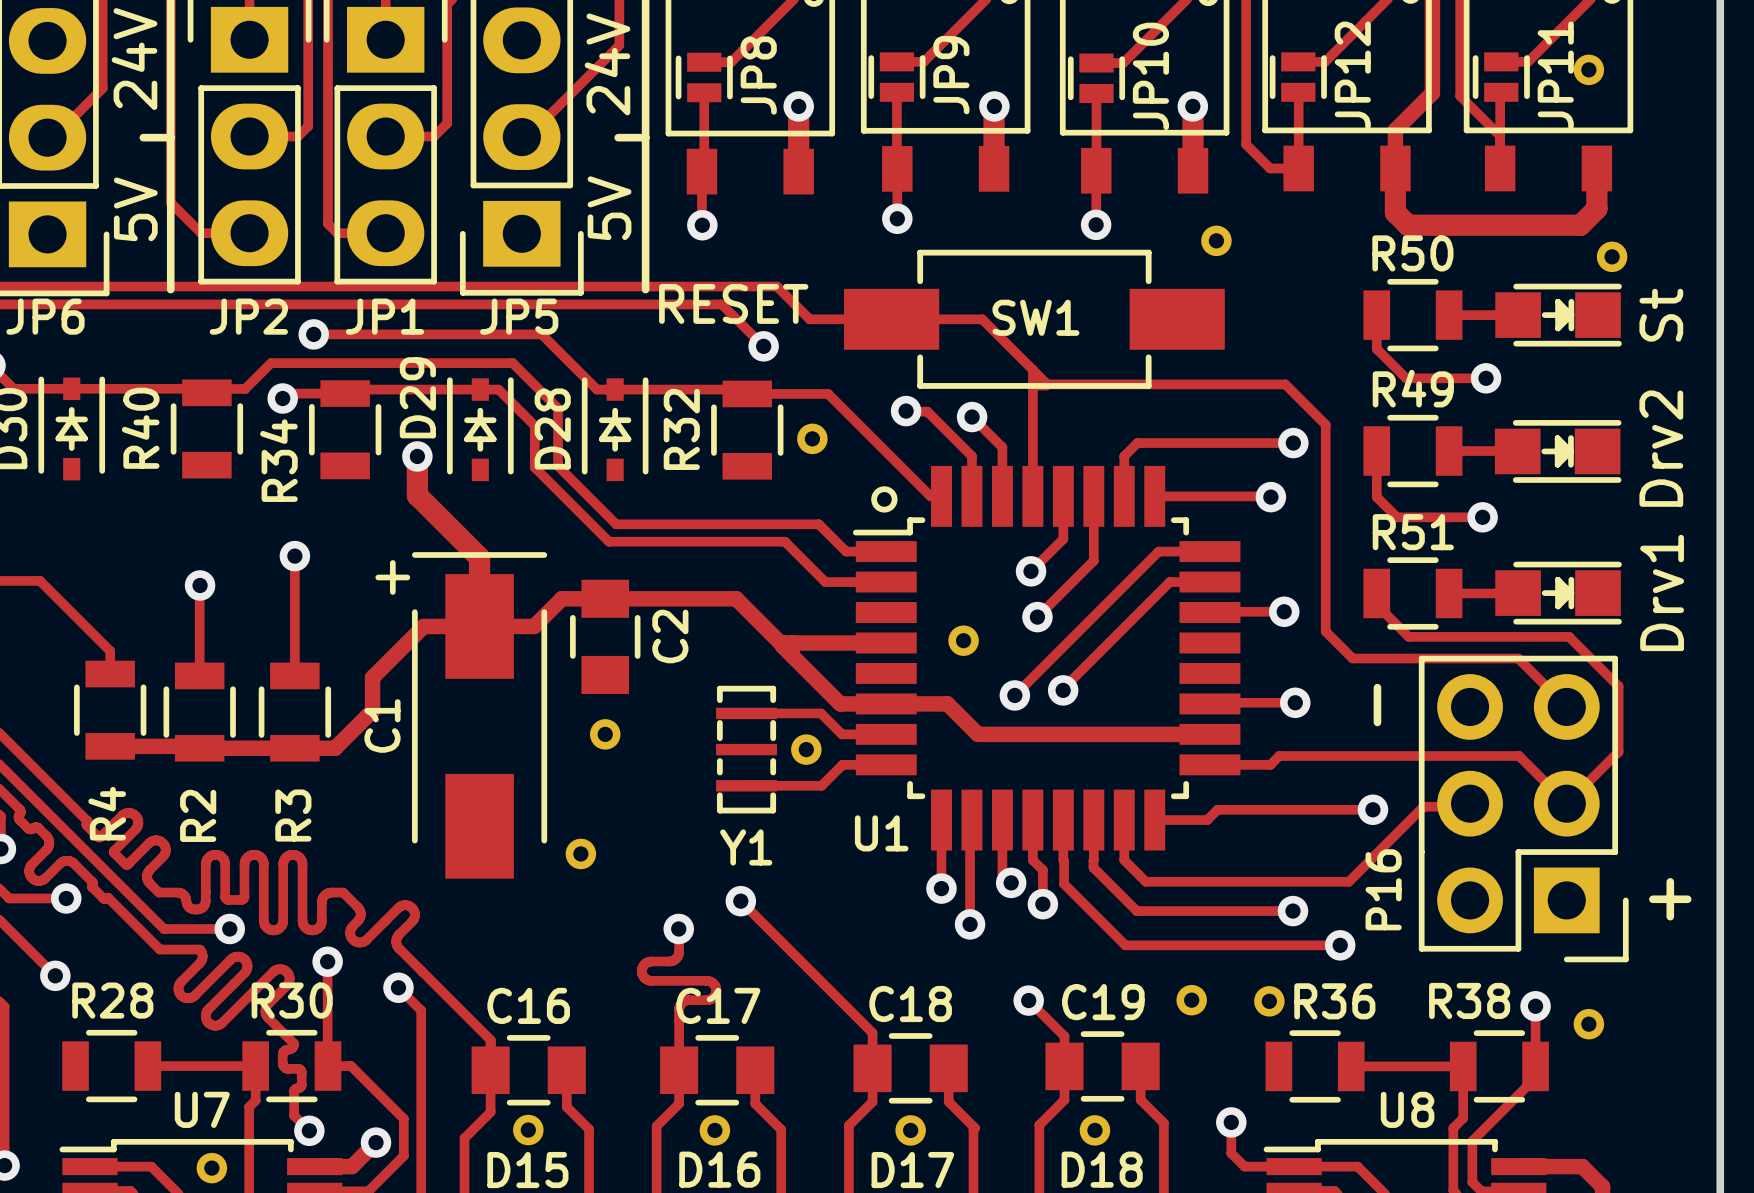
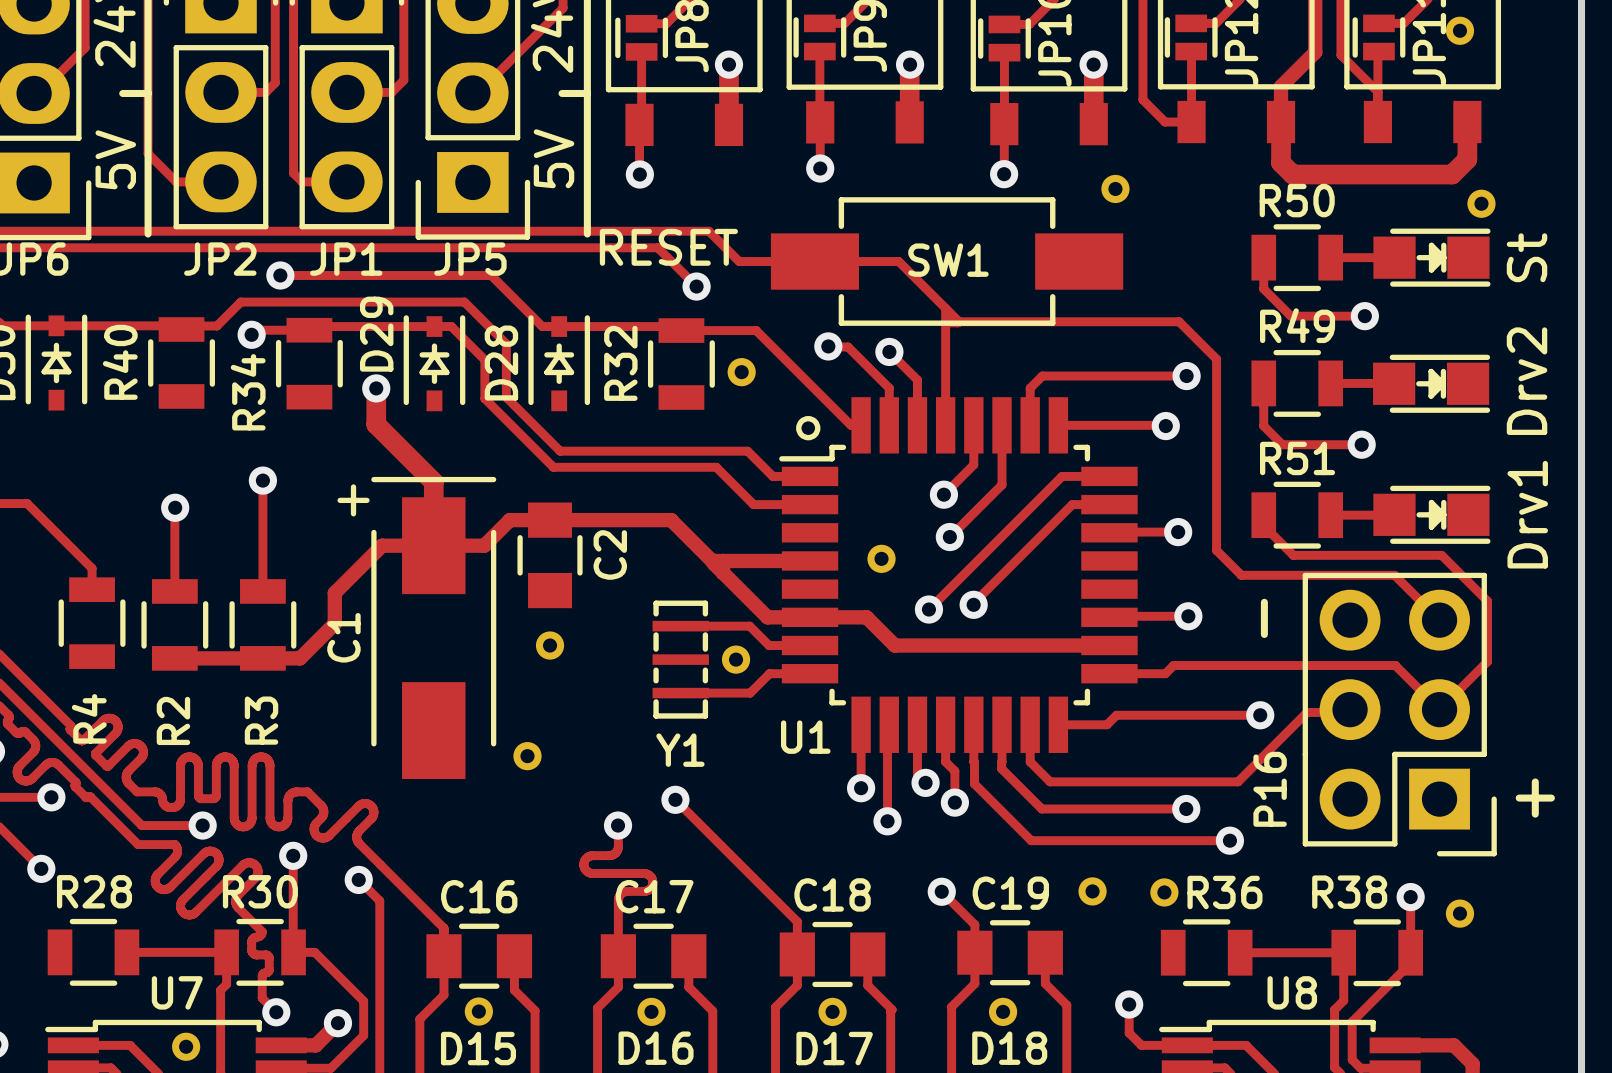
track: (110, 746) (197, 746) -> none

